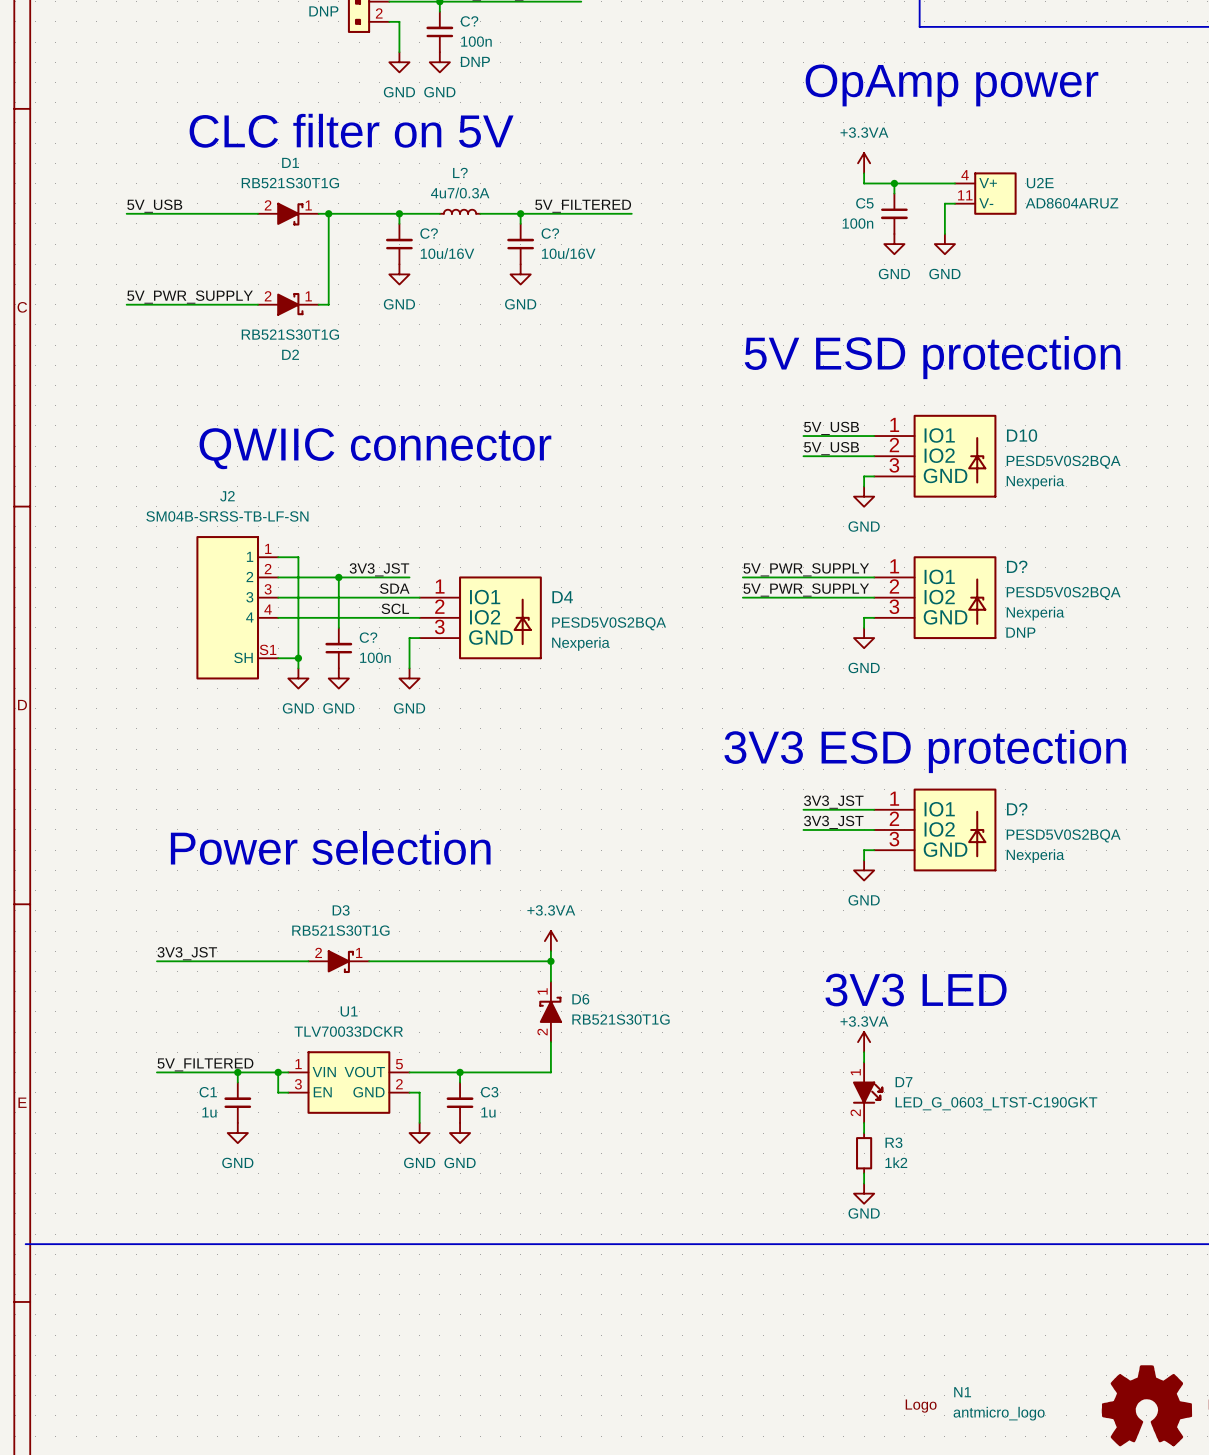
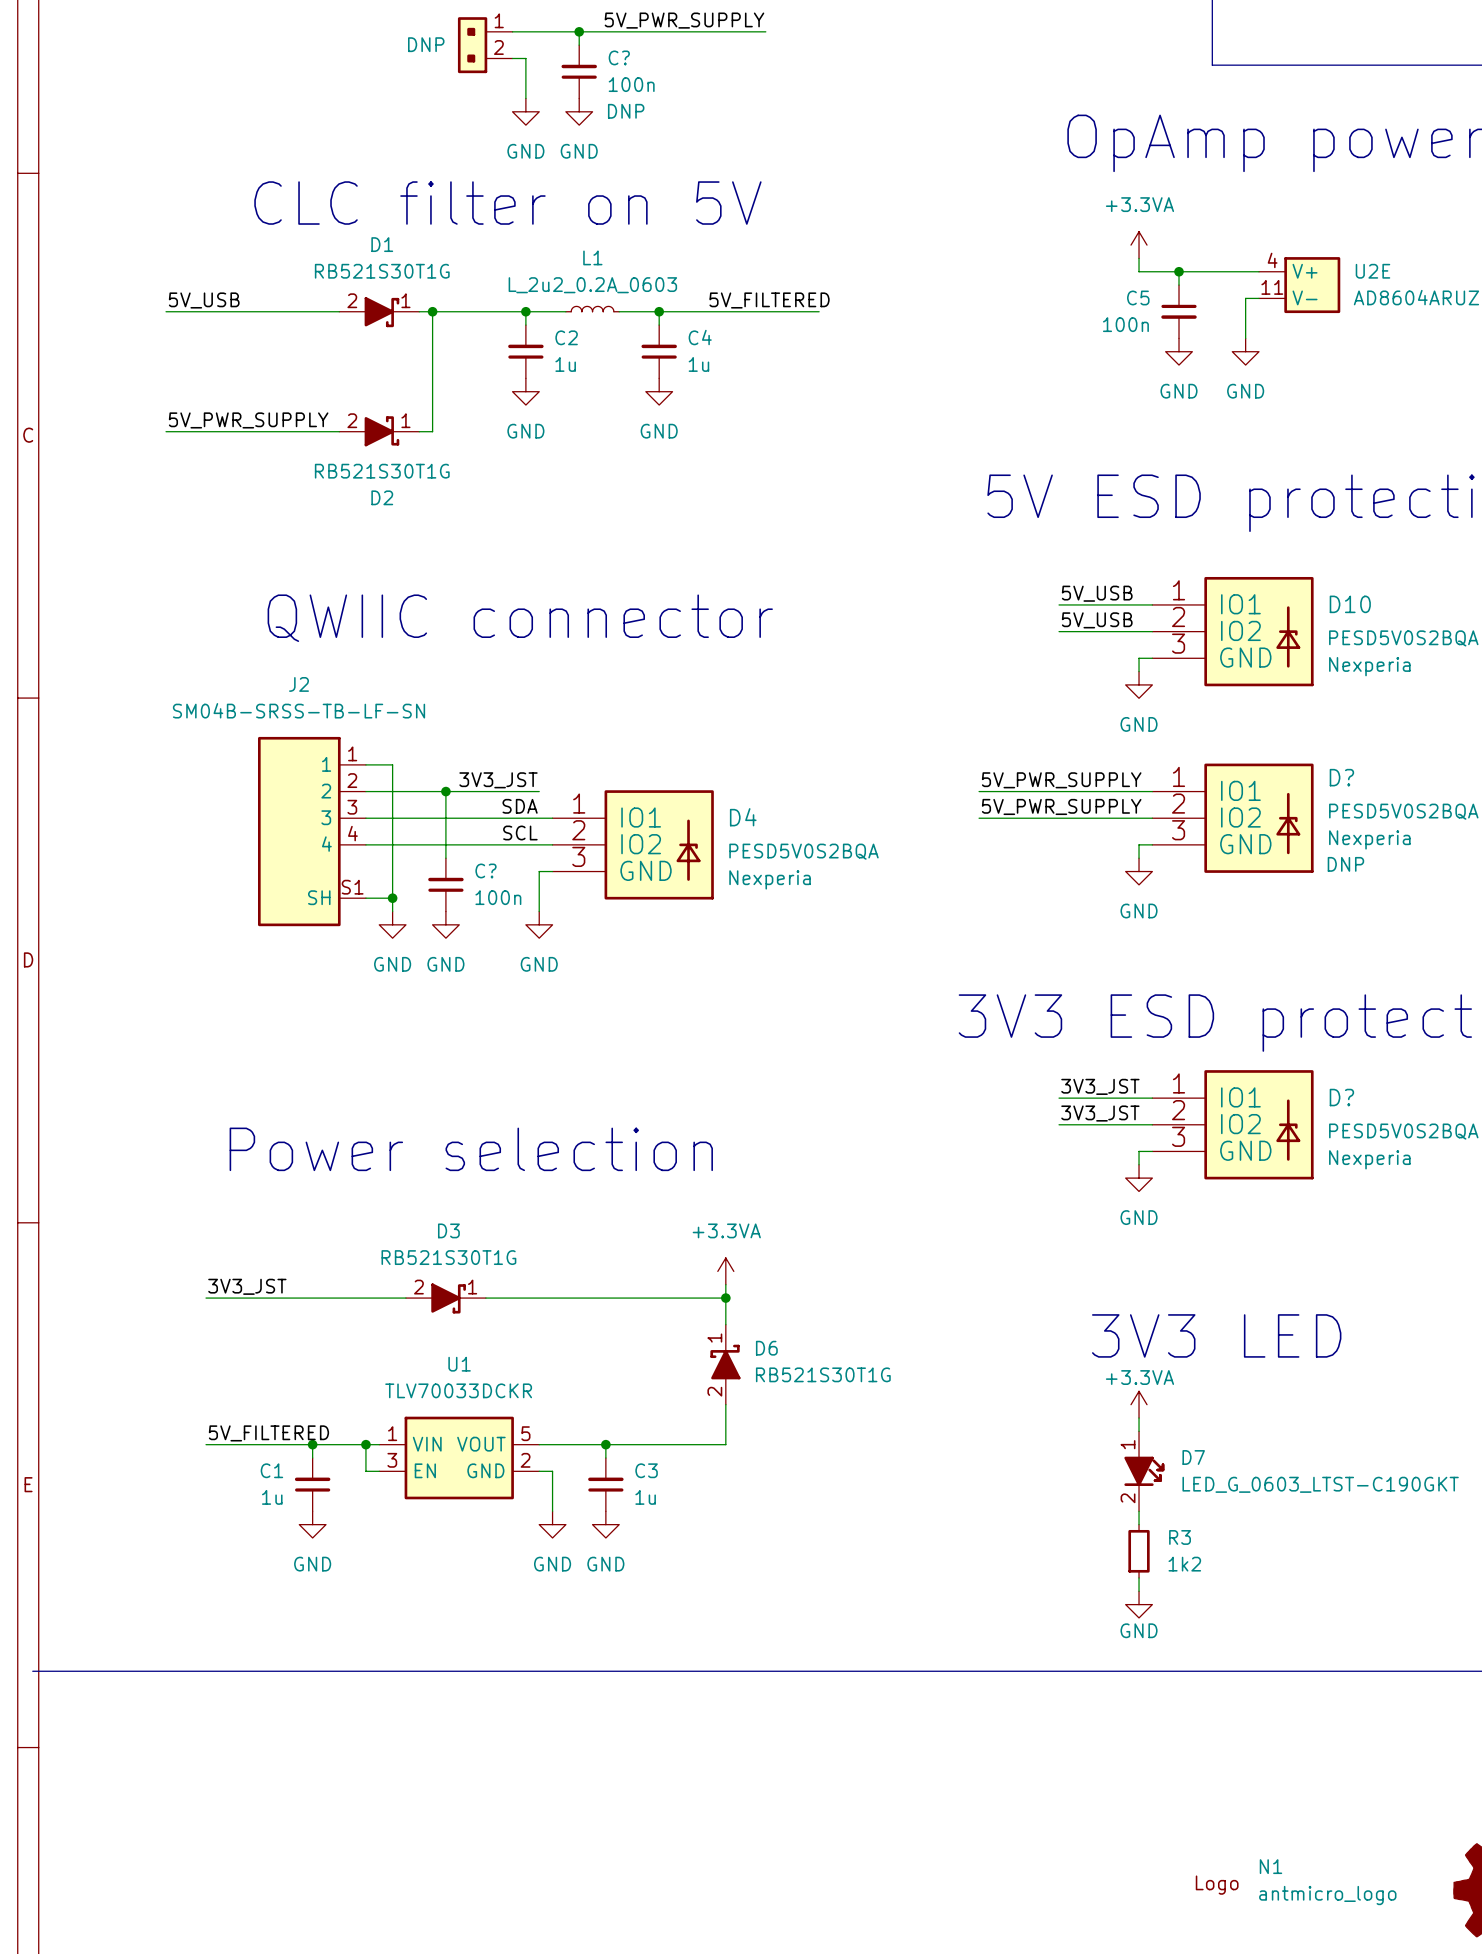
L1: none -> L_2u2_0.2A_0603 (592, 309)
L?: (460, 211) -> none
wire: (429, 213) (439, 213) -> (619, 311) (632, 311)
wire: (520, 213) (520, 223) -> (659, 311) (659, 325)
junction position: (520, 213) -> (659, 311)
wire: (621, 213) (631, 213) -> none
C? name: C? (429, 233) -> C2 (566, 337)
C4: none -> (659, 351)
C?: (520, 244) -> none
C? text: 10u/16V (447, 253) -> 1u (565, 364)
power symbol position: GND (520, 274) -> GND (659, 391)

